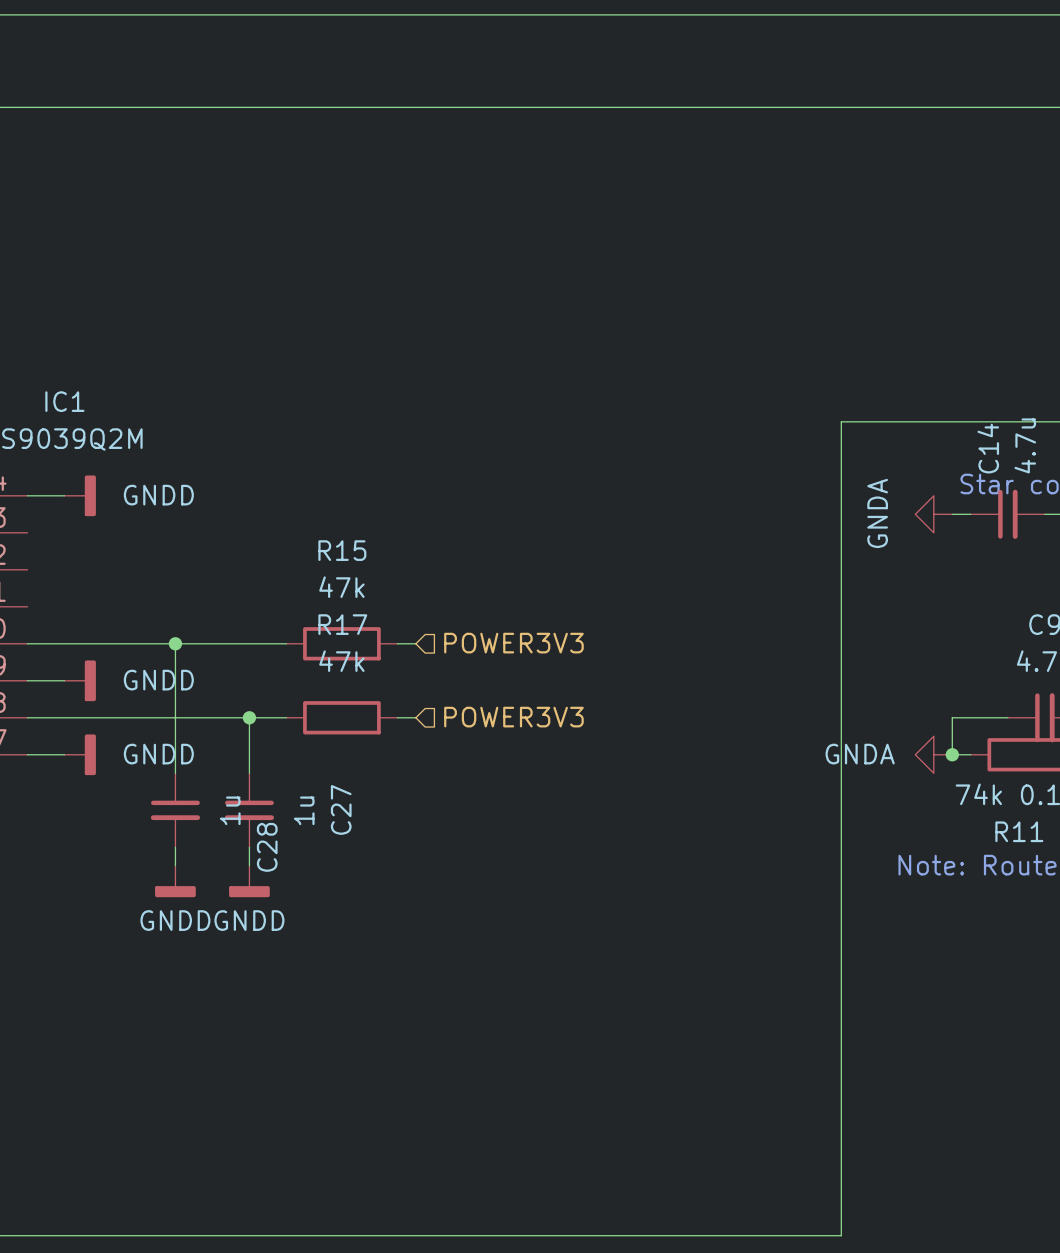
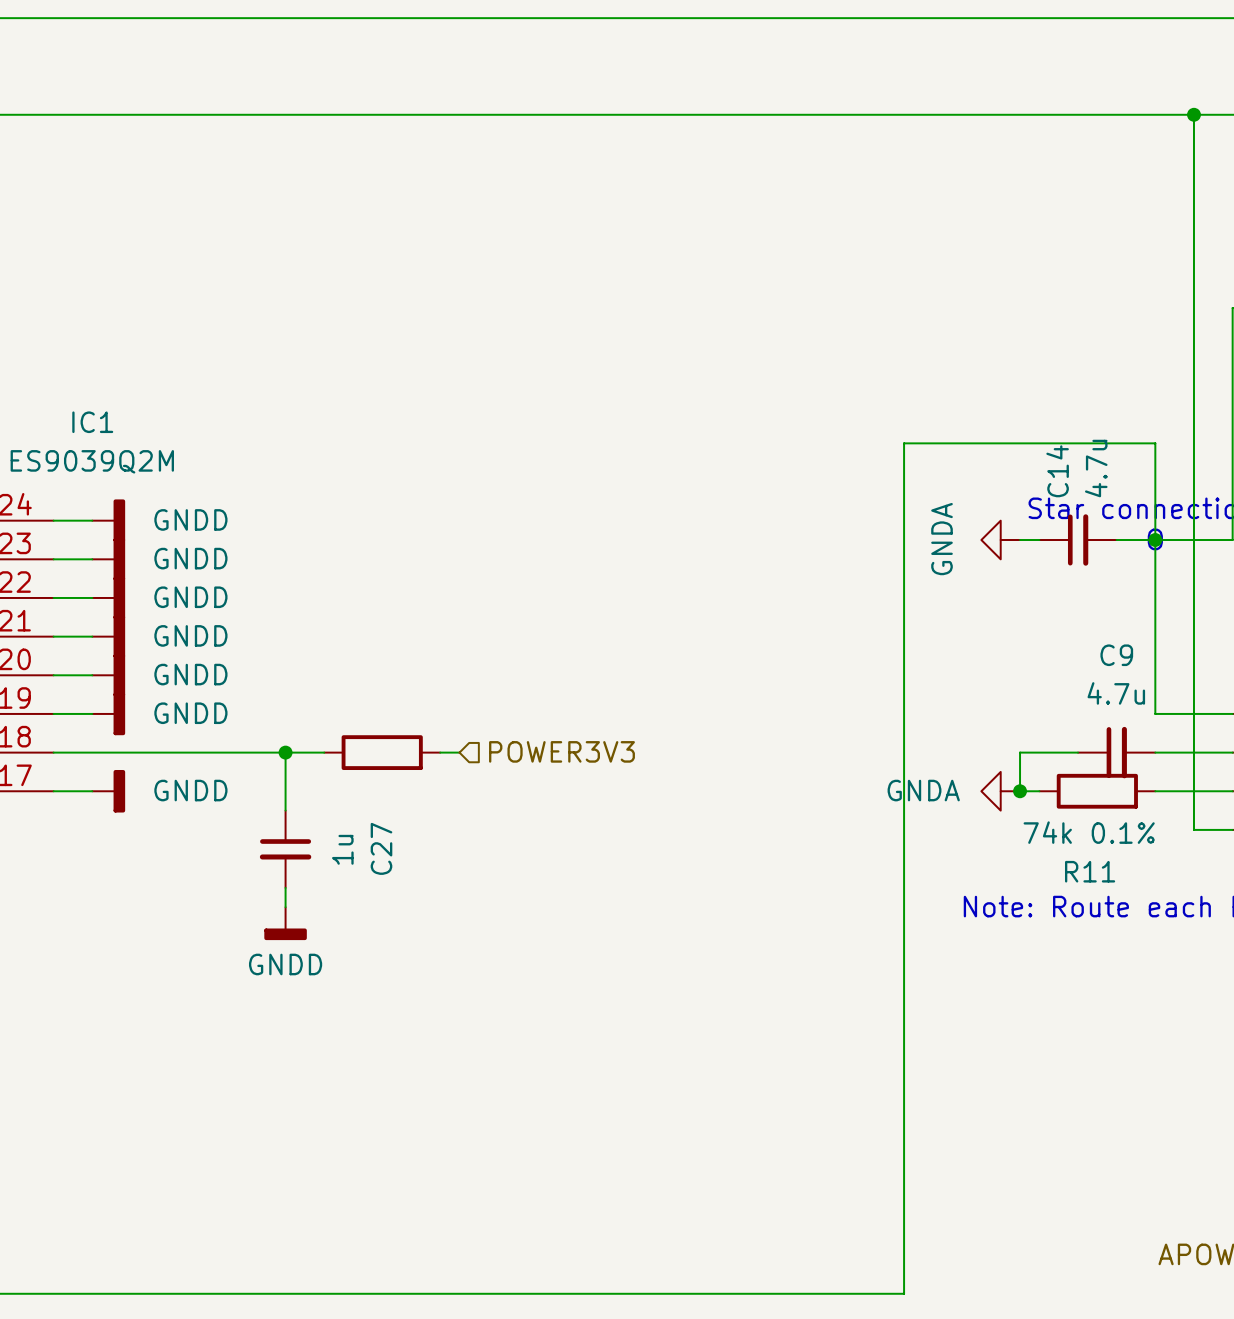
wire: none -> (53, 559) (92, 559)
power symbol: none -> GNDD (108, 559)
wire: none -> (53, 597) (92, 597)
power symbol: none -> GNDD (108, 597)
wire: none -> (53, 636) (92, 636)
power symbol: none -> GNDD (108, 636)
R17 name: R17 (342, 624) -> none
wire: (64, 643) (286, 643) -> none
power symbol: none -> GNDD (108, 675)
wire: (175, 643) (175, 773) -> none
junction: (175, 643) -> none
R15: 47k (341, 643) -> none
wire: (397, 643) (415, 643) -> none
hierarchical label: POWER3V3 (513, 643) -> none
R17 value: 47k (341, 661) -> none
C28: 1u (175, 810) -> none
wire: (175, 847) (175, 865) -> none
power symbol: GNDD (175, 881) -> none

